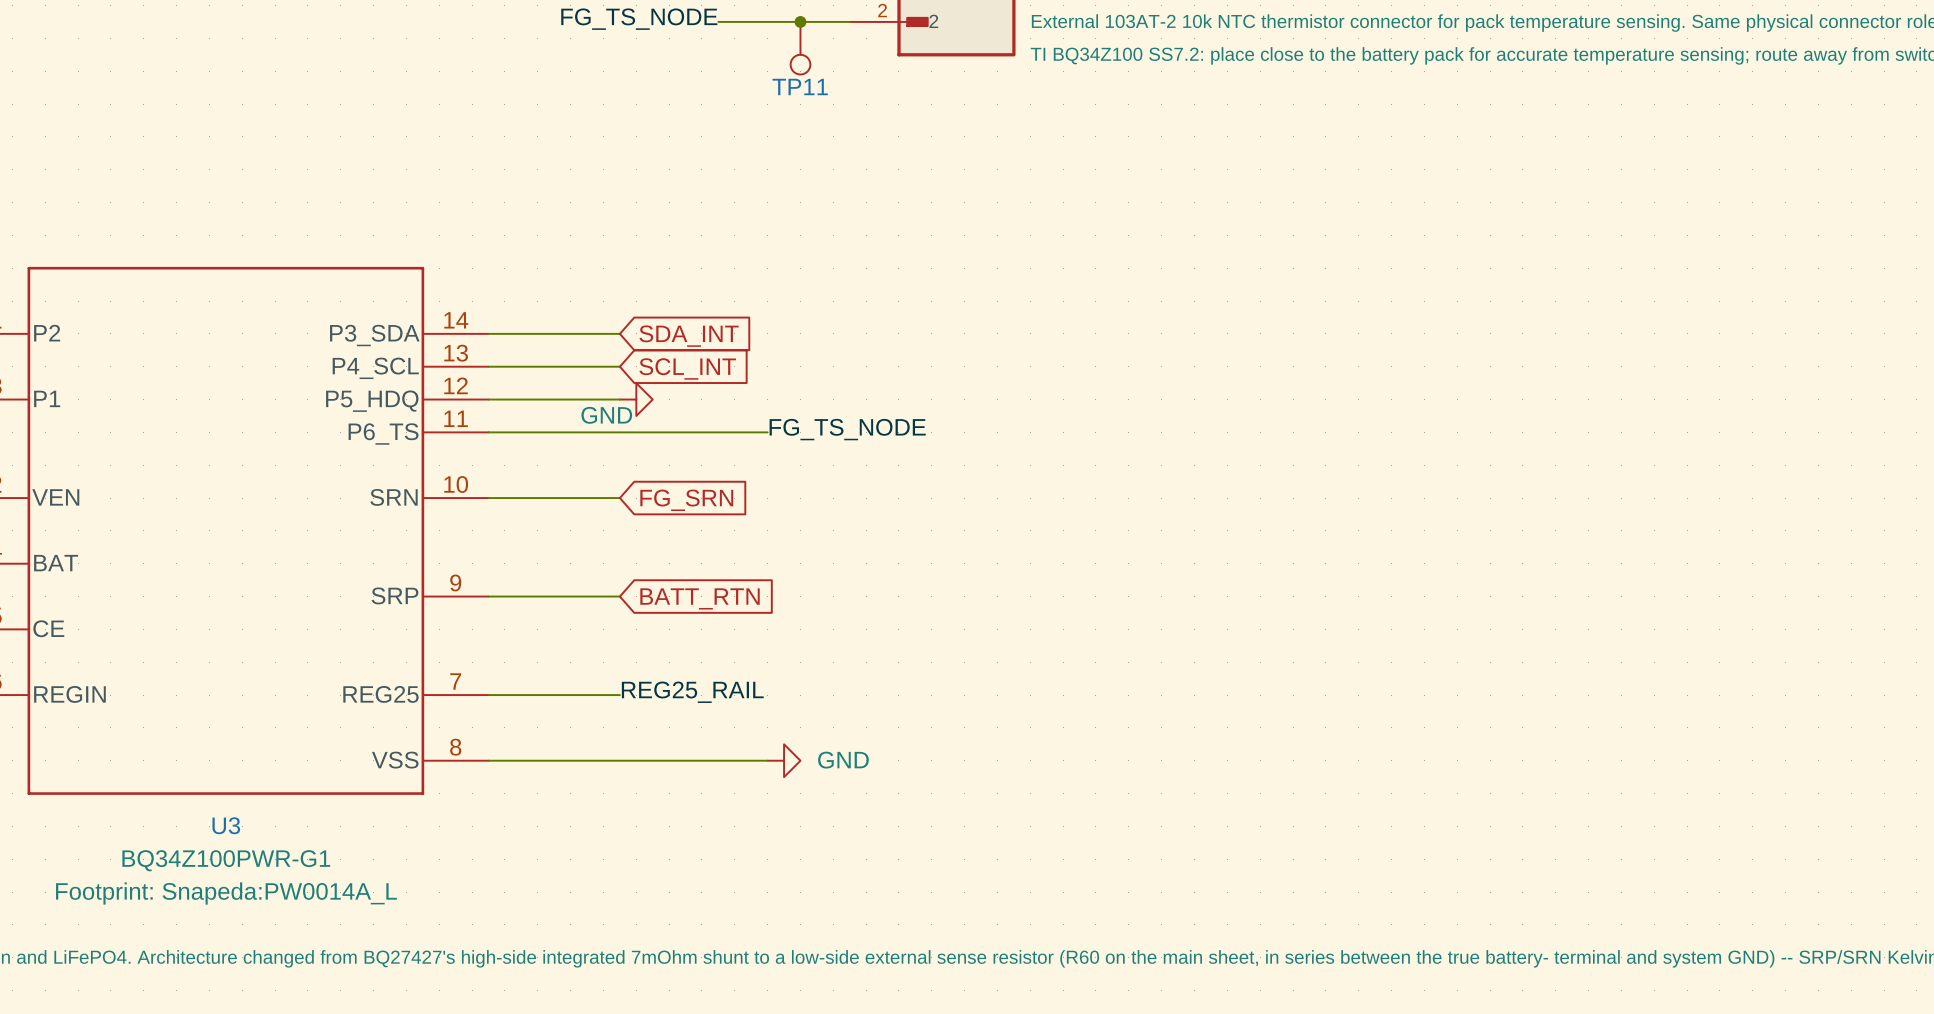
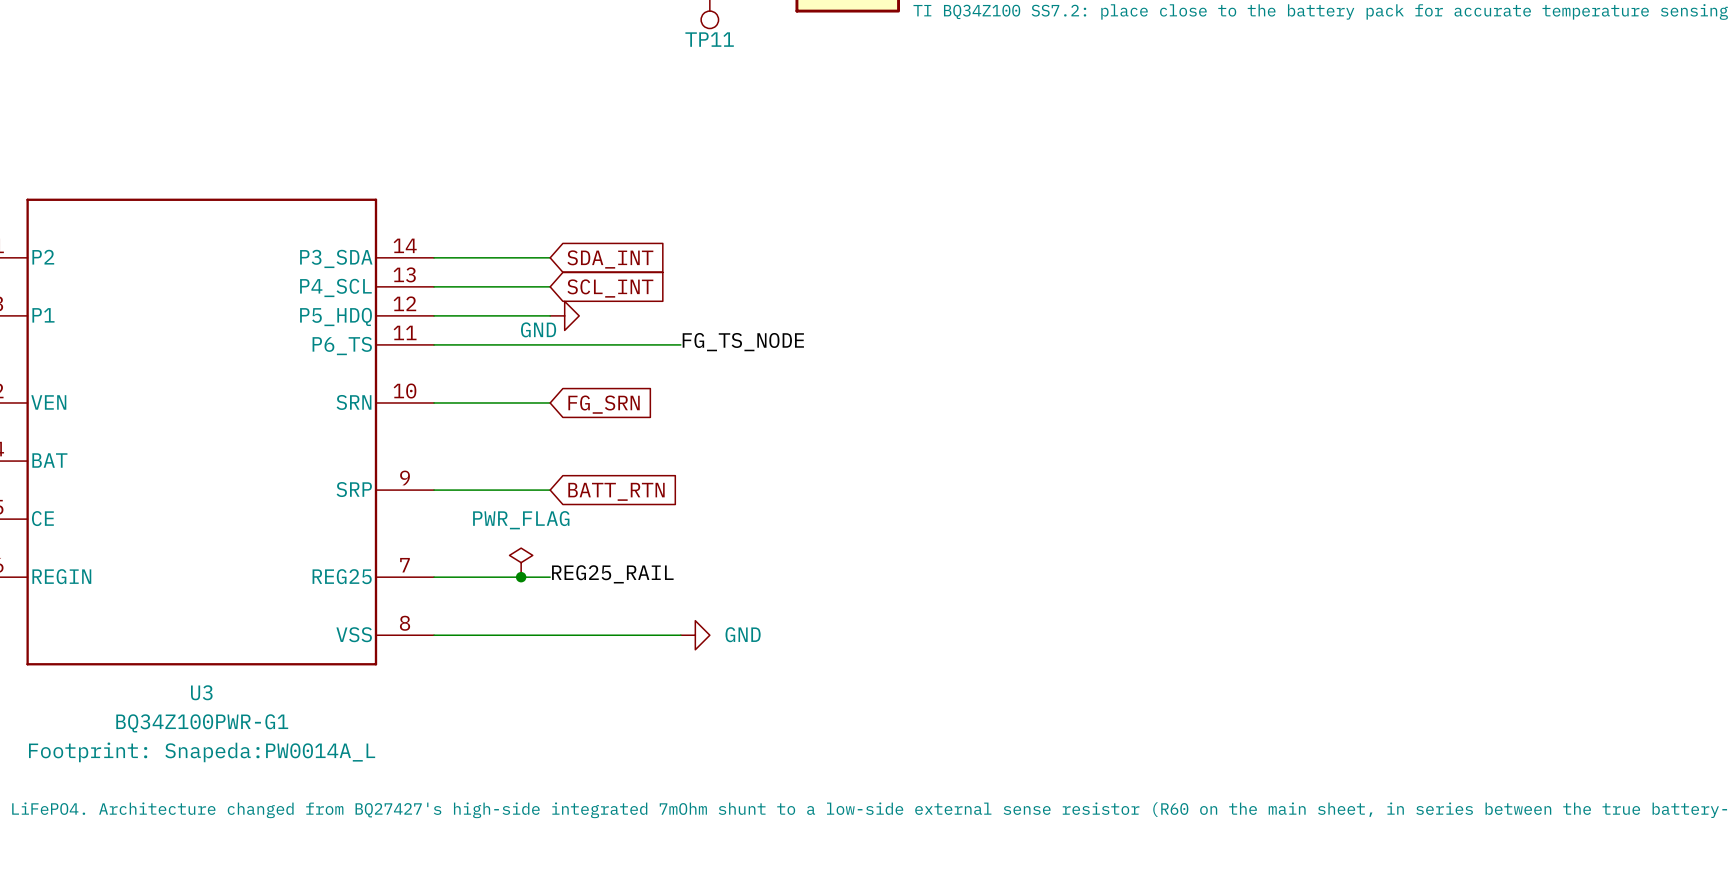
power symbol: none -> PWR_FLAG (521, 562)
junction: none -> (521, 577)

